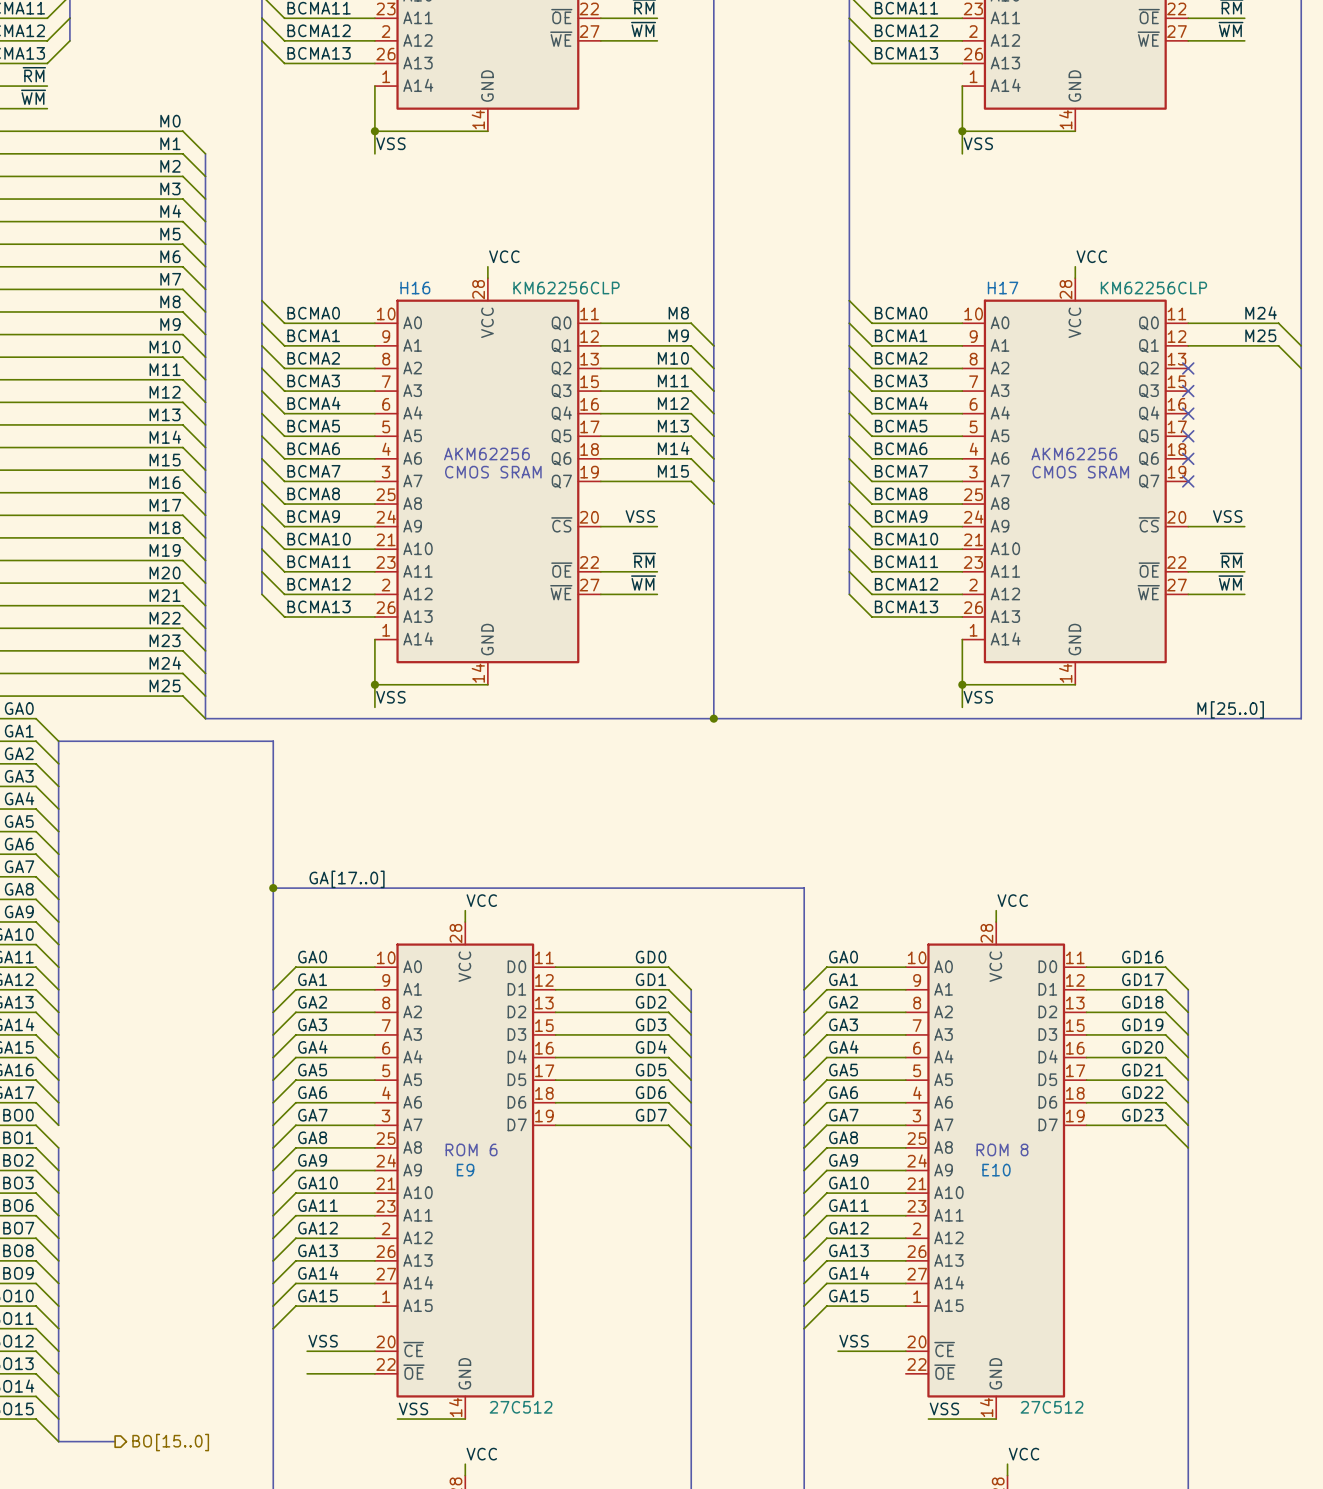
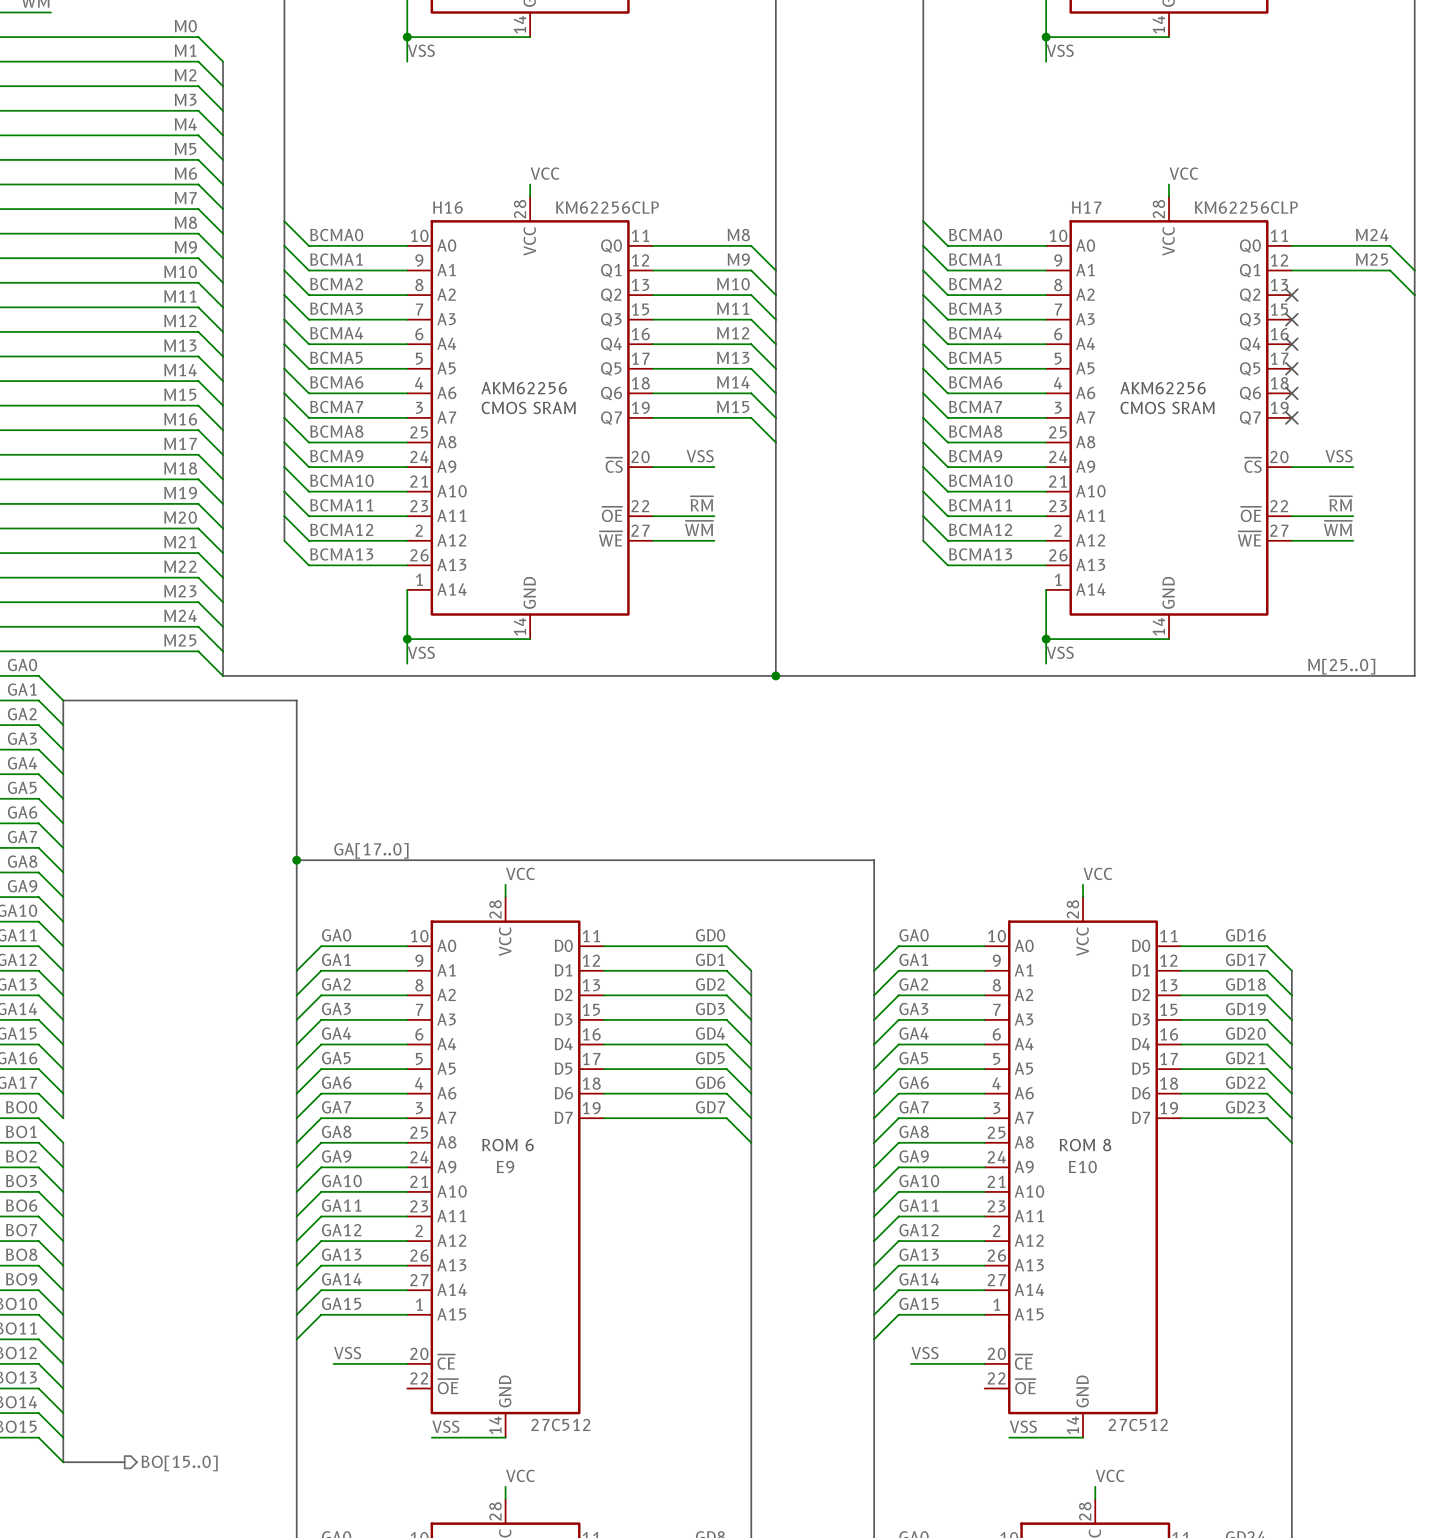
wire: (307, 1373) (374, 1373) -> none

